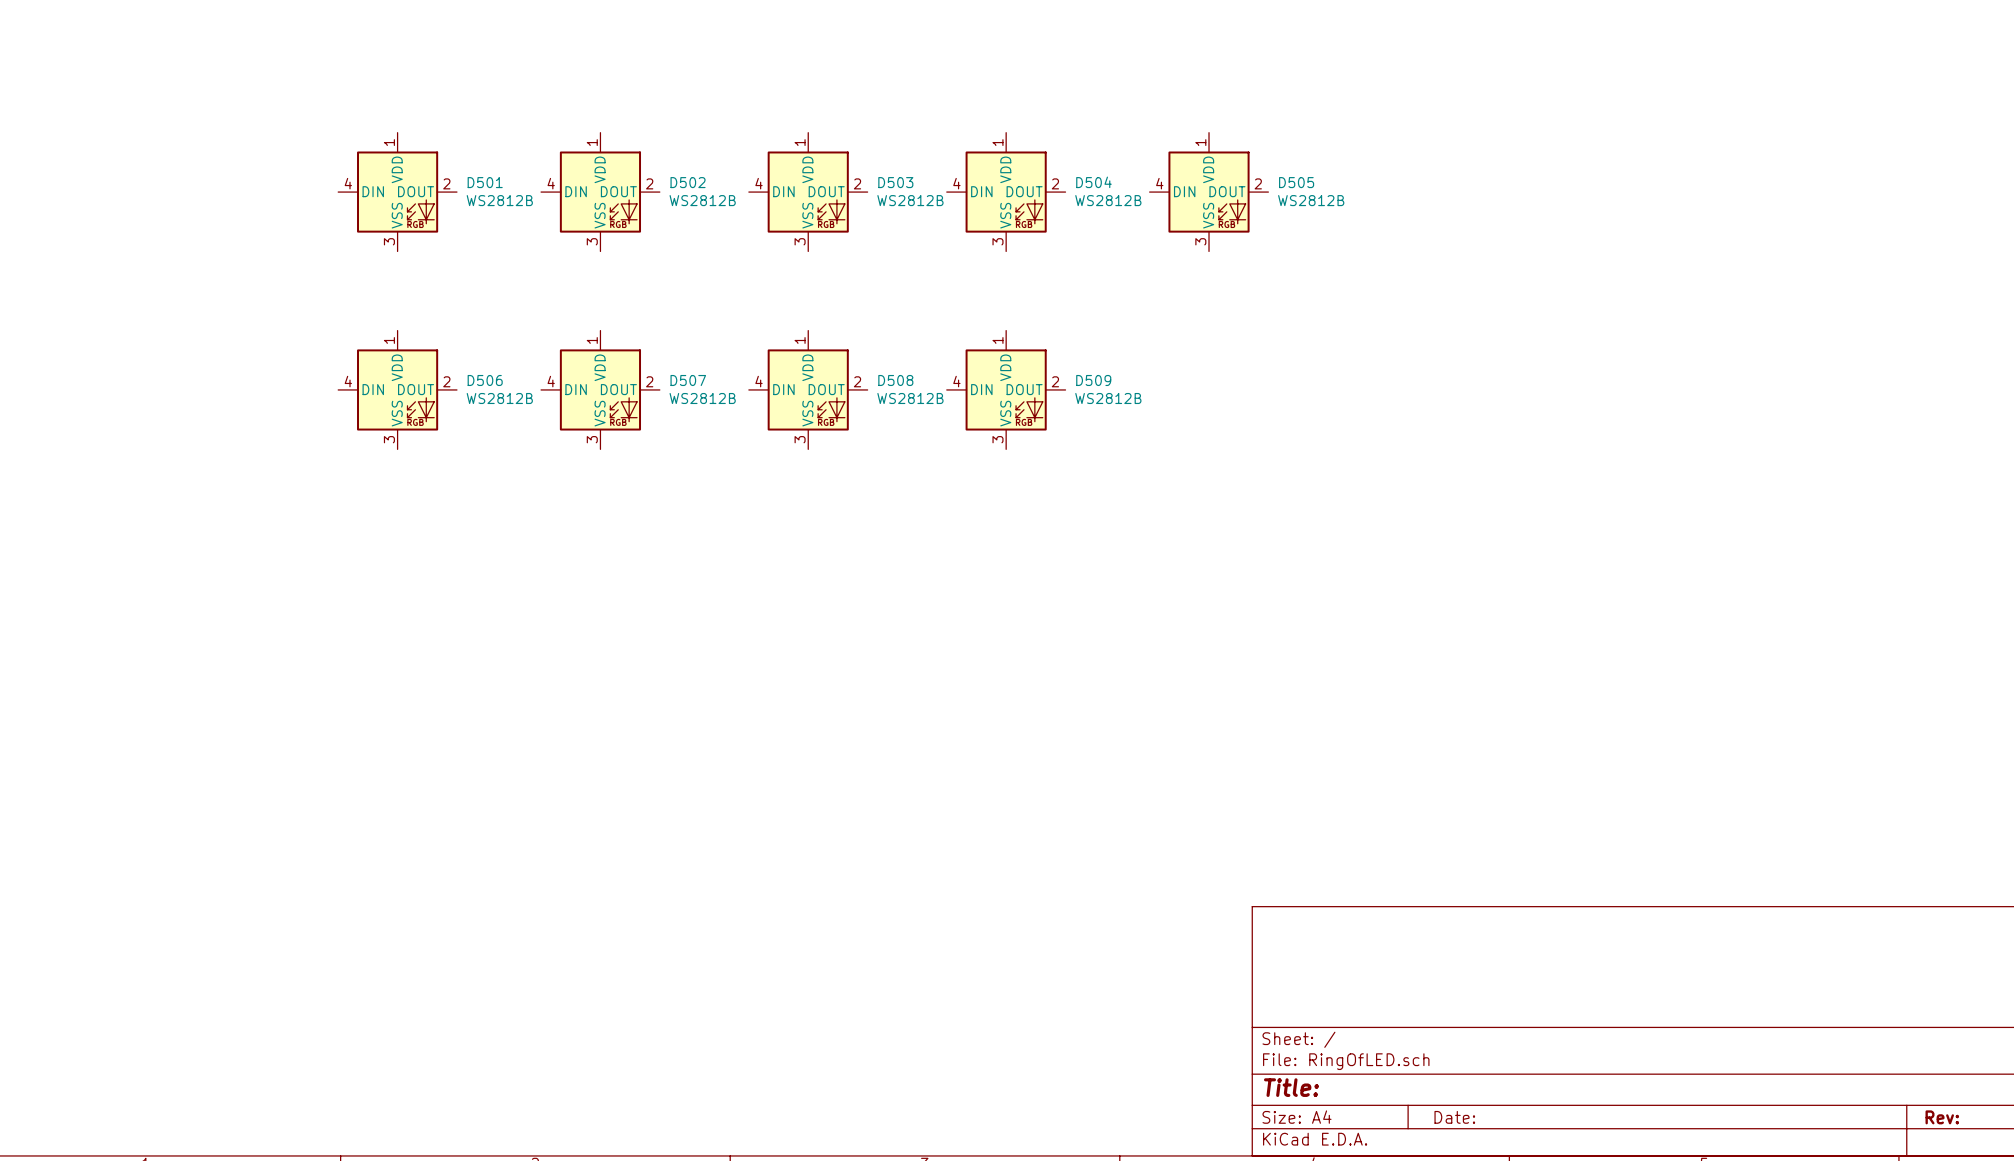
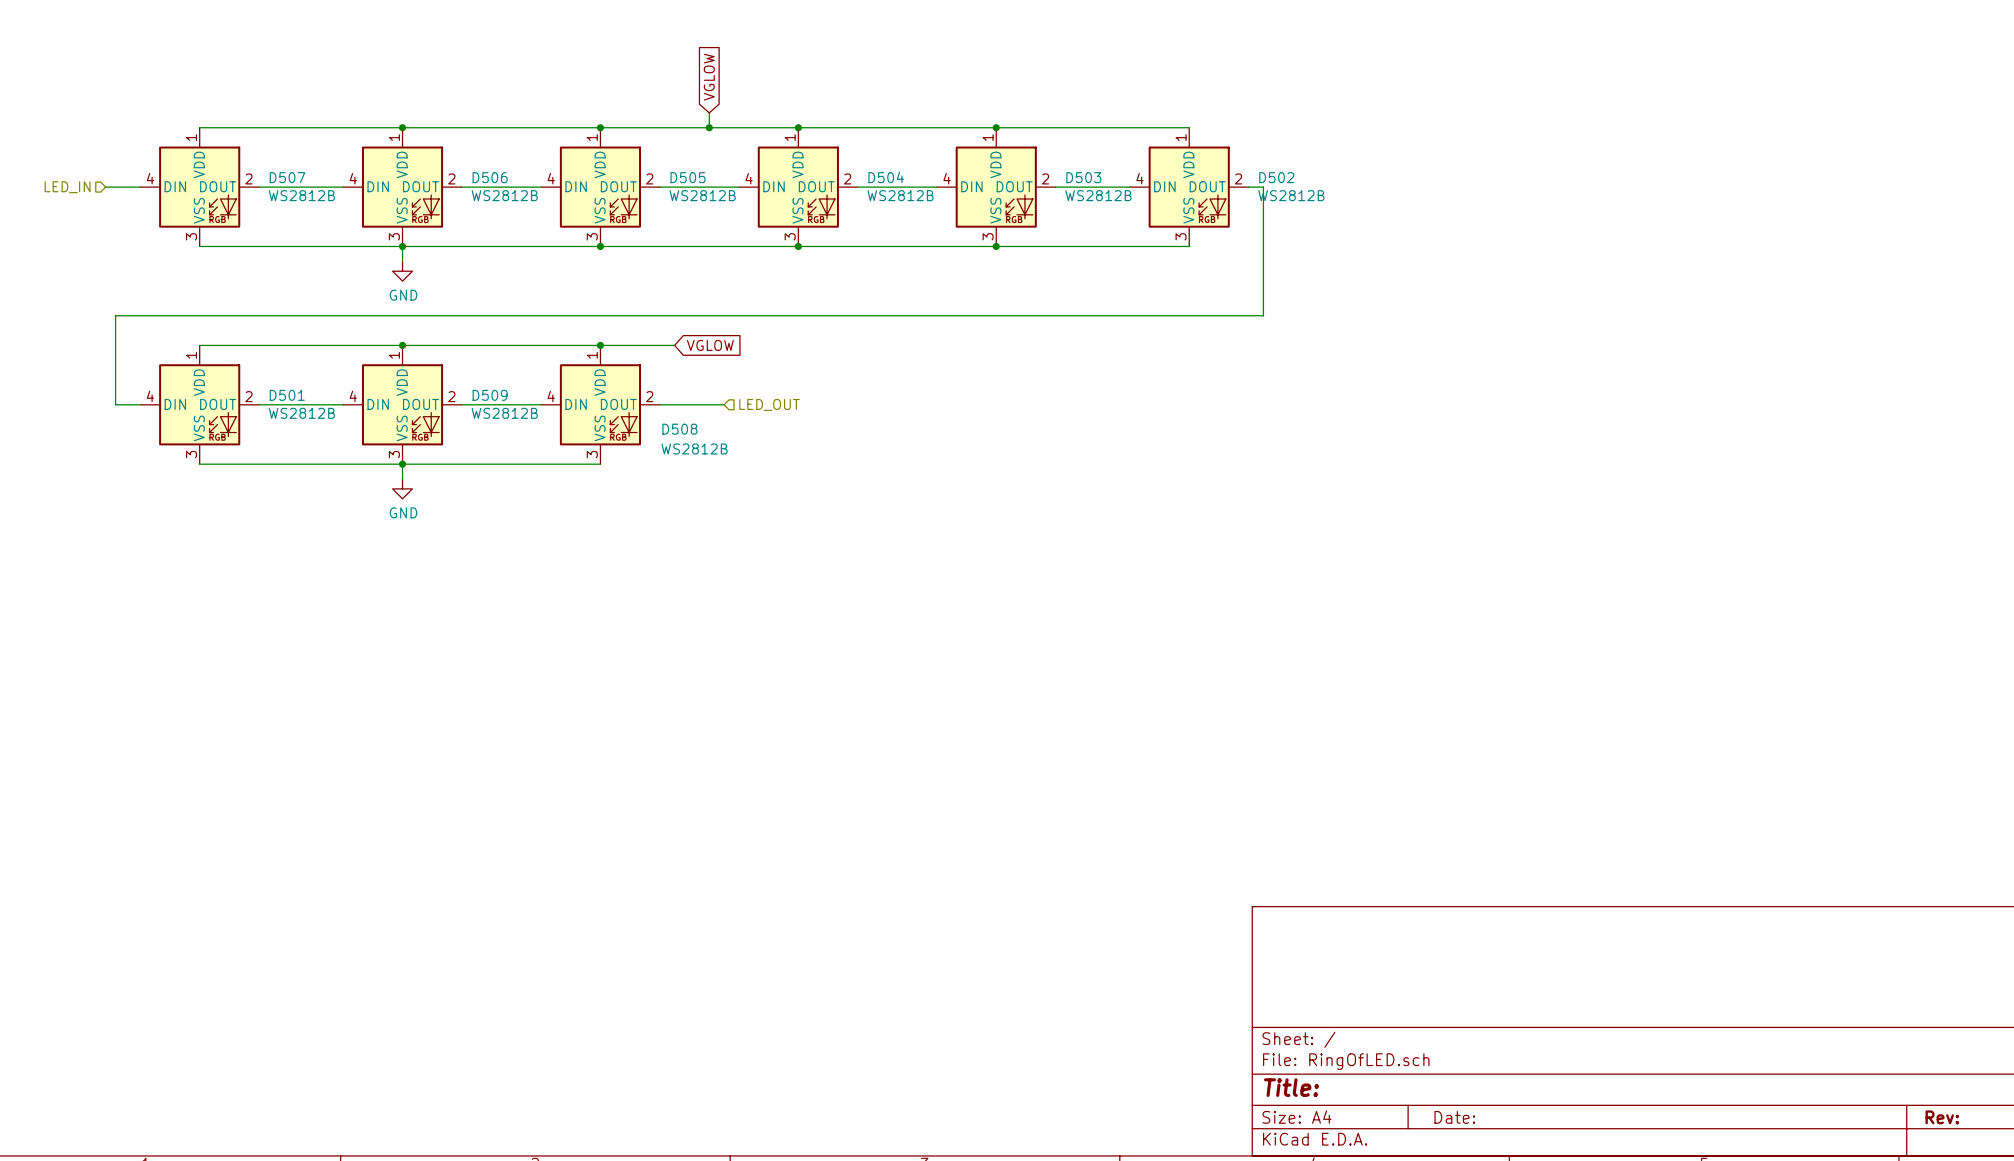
global label: none -> VGLOW (709, 77)
wire: none -> (709, 112) (709, 127)
wire: none -> (199, 127) (1189, 127)
junction: none -> (402, 127)
junction: none -> (600, 127)
junction: none -> (709, 127)
junction: none -> (798, 127)
junction: none -> (996, 127)
hierarchical label: none -> LED_IN (67, 187)
wire: none -> (105, 187) (140, 187)
wire: none -> (259, 187) (343, 187)
wire: none -> (461, 187) (541, 187)
wire: none -> (659, 187) (738, 187)
wire: none -> (857, 187) (936, 187)
wire: none -> (1055, 187) (1129, 187)
wire: none -> (1248, 187) (1263, 187) (1263, 315) (115, 315) (115, 404) (140, 404)
D501 position: (397, 192) -> (199, 404)
D502 position: (600, 192) -> (1189, 187)
D503 position: (808, 192) -> (996, 187)
D504 position: (1006, 192) -> (798, 187)
D505 position: (1209, 192) -> (600, 187)
wire: none -> (199, 246) (1189, 246)
wire: none -> (402, 246) (402, 261)
junction: none -> (402, 246)
junction: none -> (600, 246)
junction: none -> (798, 246)
junction: none -> (996, 246)
power symbol: none -> GND (402, 271)
wire: none -> (199, 345) (674, 345)
junction: none -> (402, 345)
junction: none -> (600, 345)
global label: none -> VGLOW (710, 345)
D508 name position: D508 (895, 380) -> D508 (679, 429)
D506 position: (397, 389) -> (402, 187)
D507 position: (600, 389) -> (199, 187)
D508 position: (808, 389) -> (600, 404)
D509 position: (1006, 389) -> (402, 404)
D508 value position: WS2812B (910, 398) -> WS2812B (694, 448)
wire: none -> (259, 404) (343, 404)
wire: none -> (461, 404) (541, 404)
wire: none -> (659, 404) (724, 404)
hierarchical label: none -> LED_OUT (769, 404)
wire: none -> (199, 464) (600, 464)
wire: none -> (402, 464) (402, 479)
junction: none -> (402, 464)
power symbol: none -> GND (402, 488)

